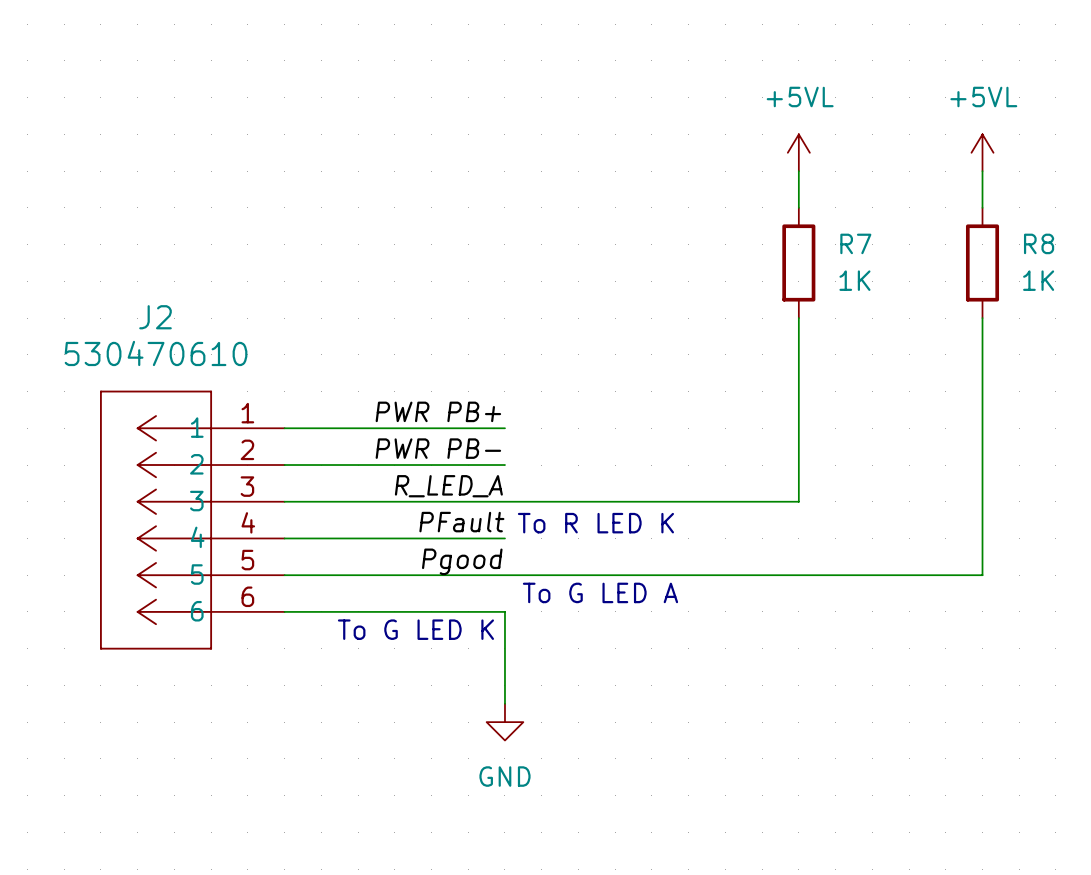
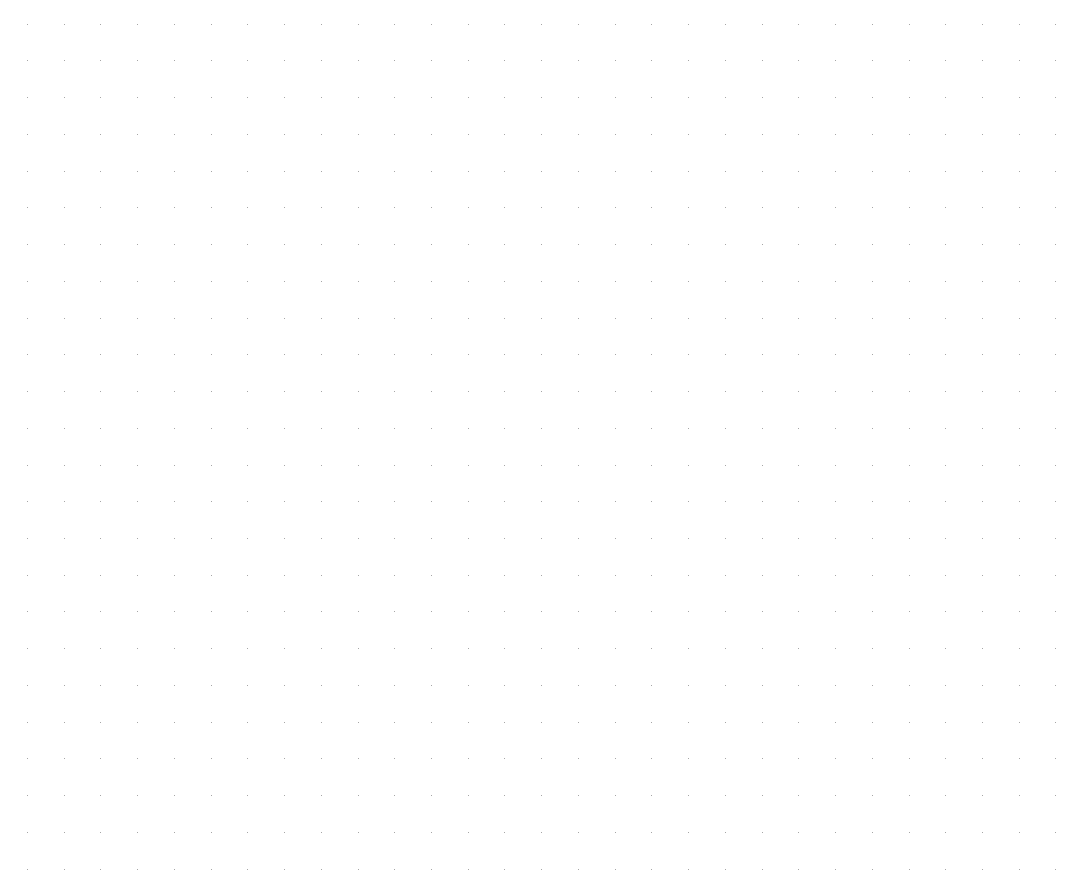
power symbol: +5VL (798, 152) -> none
power symbol: +5VL (982, 152) -> none
wire: (798, 171) (798, 207) -> none
wire: (982, 171) (982, 207) -> none
R7: 1K (798, 262) -> none
R8: 1K (982, 262) -> none
wire: (798, 318) (798, 501) (284, 501) -> none
wire: (982, 318) (982, 575) (284, 575) -> none
label: PWR PB+ (438, 411) -> none
wire: (284, 428) (504, 428) -> none
label: PWR PB- (438, 448) -> none
wire: (284, 465) (504, 465) -> none
label: R_LED_A (448, 486) -> none
J2: 530470610 (192, 520) -> none
label: PFault (461, 522) -> none
text: To R LED K (595, 523) -> none
wire: (284, 538) (504, 538) -> none
label: Pgood (462, 561) -> none
text: To G LED A (600, 592) -> none
wire: (284, 611) (504, 611) (504, 703) -> none
text: To G LED K (415, 629) -> none
power symbol: GND (504, 722) -> none

